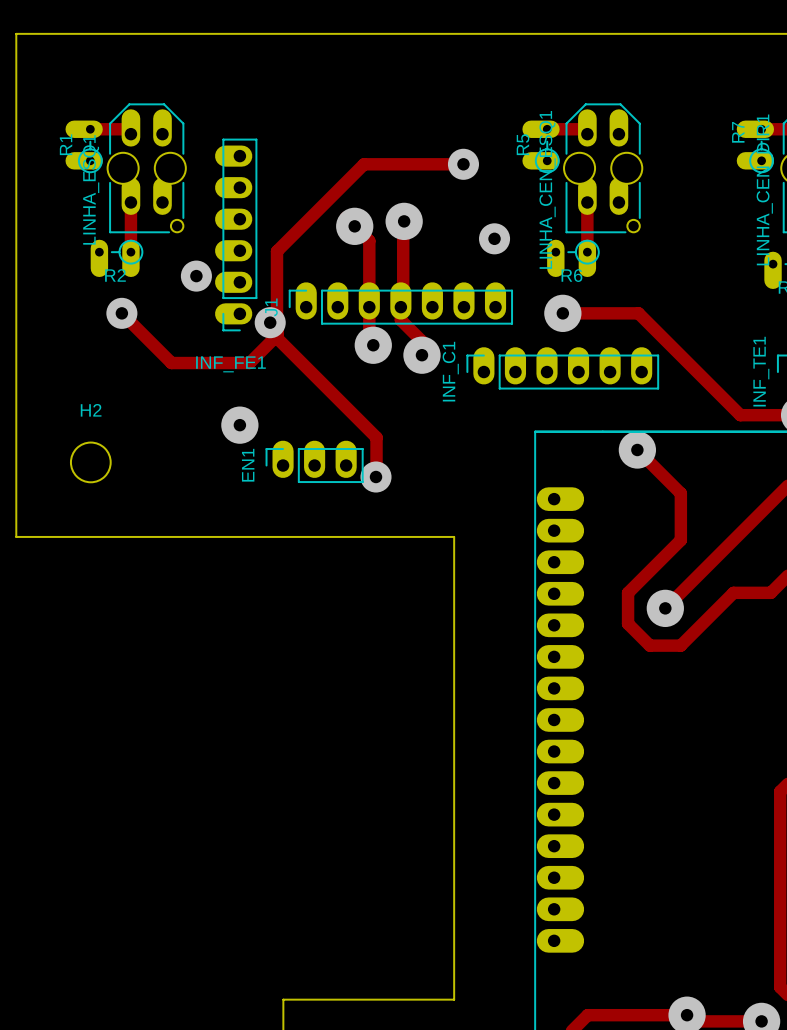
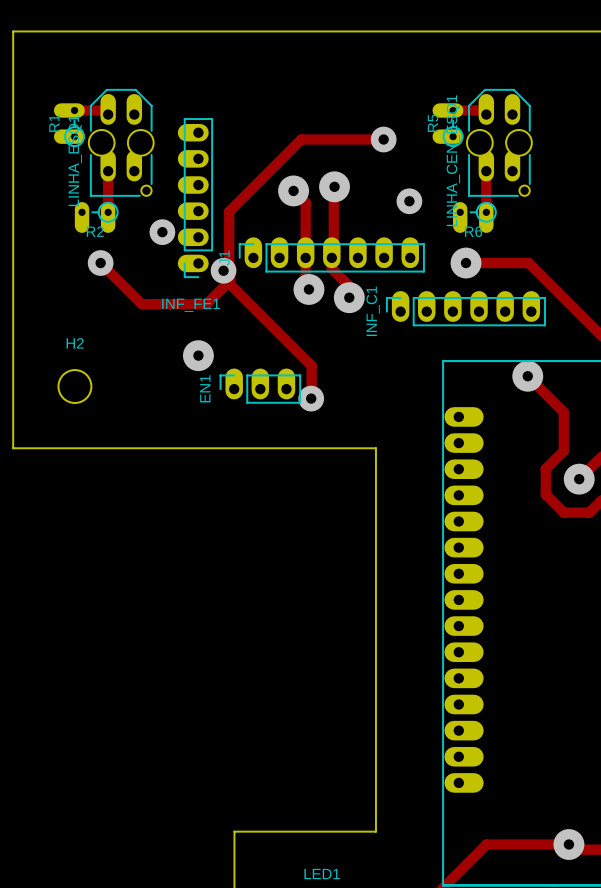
track: (659, 561) (628, 592) (628, 623) (649, 645) (680, 645) (711, 614) -> (545, 468) (545, 494) (563, 512) (589, 512)
track: (699, 574) (665, 608) -> none
via position: (665, 608) -> (579, 479)

